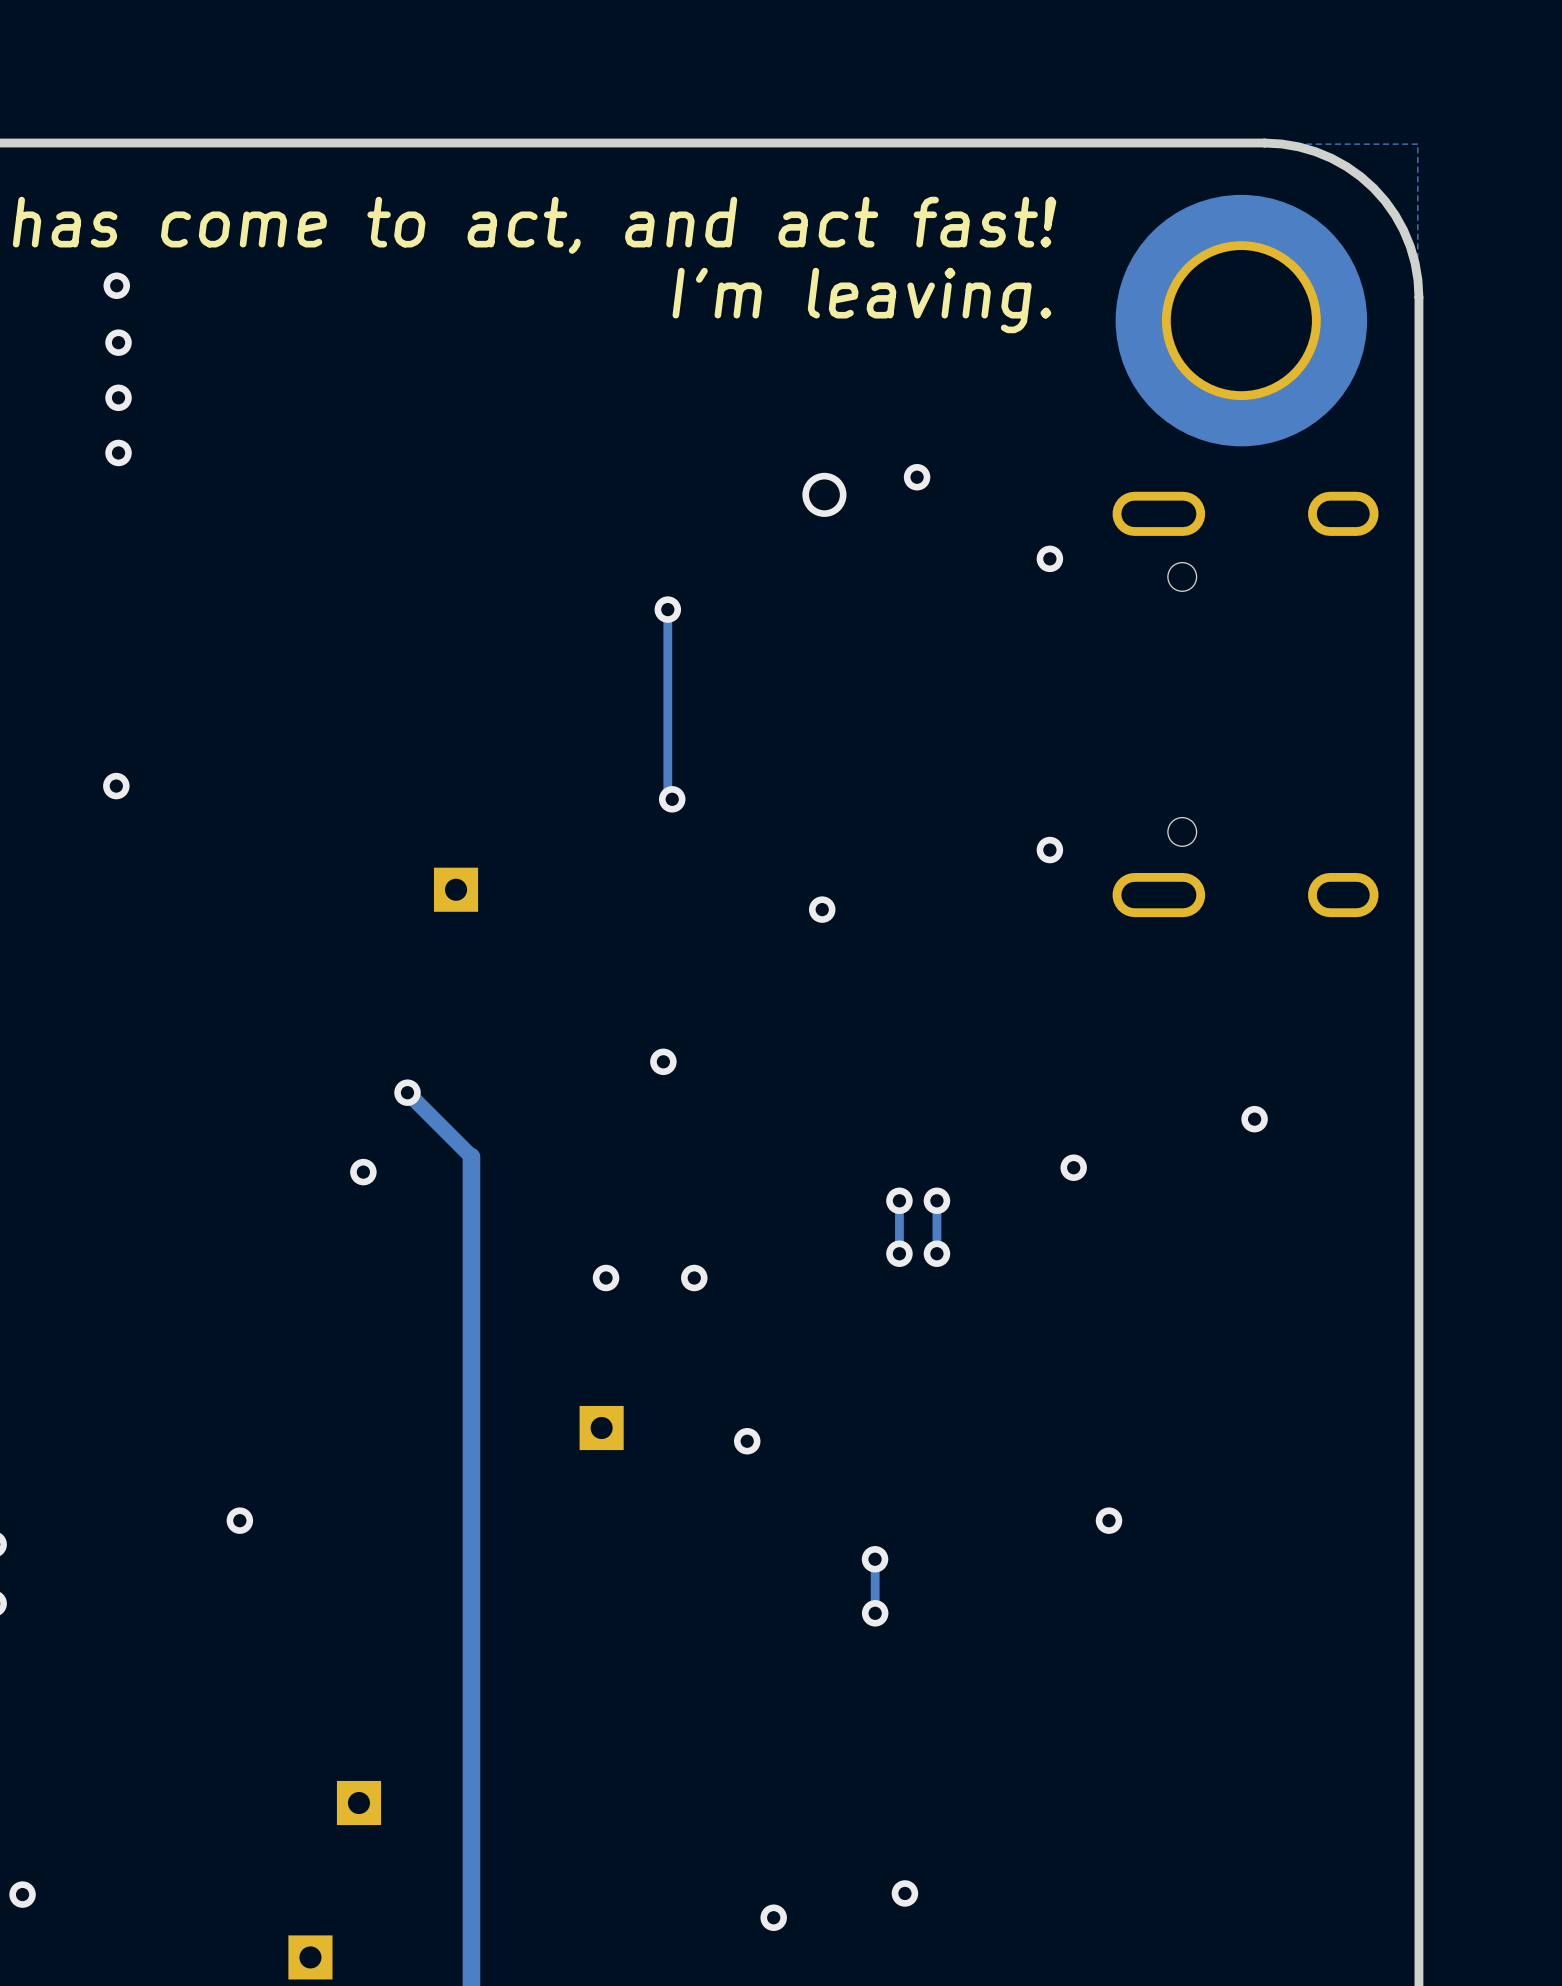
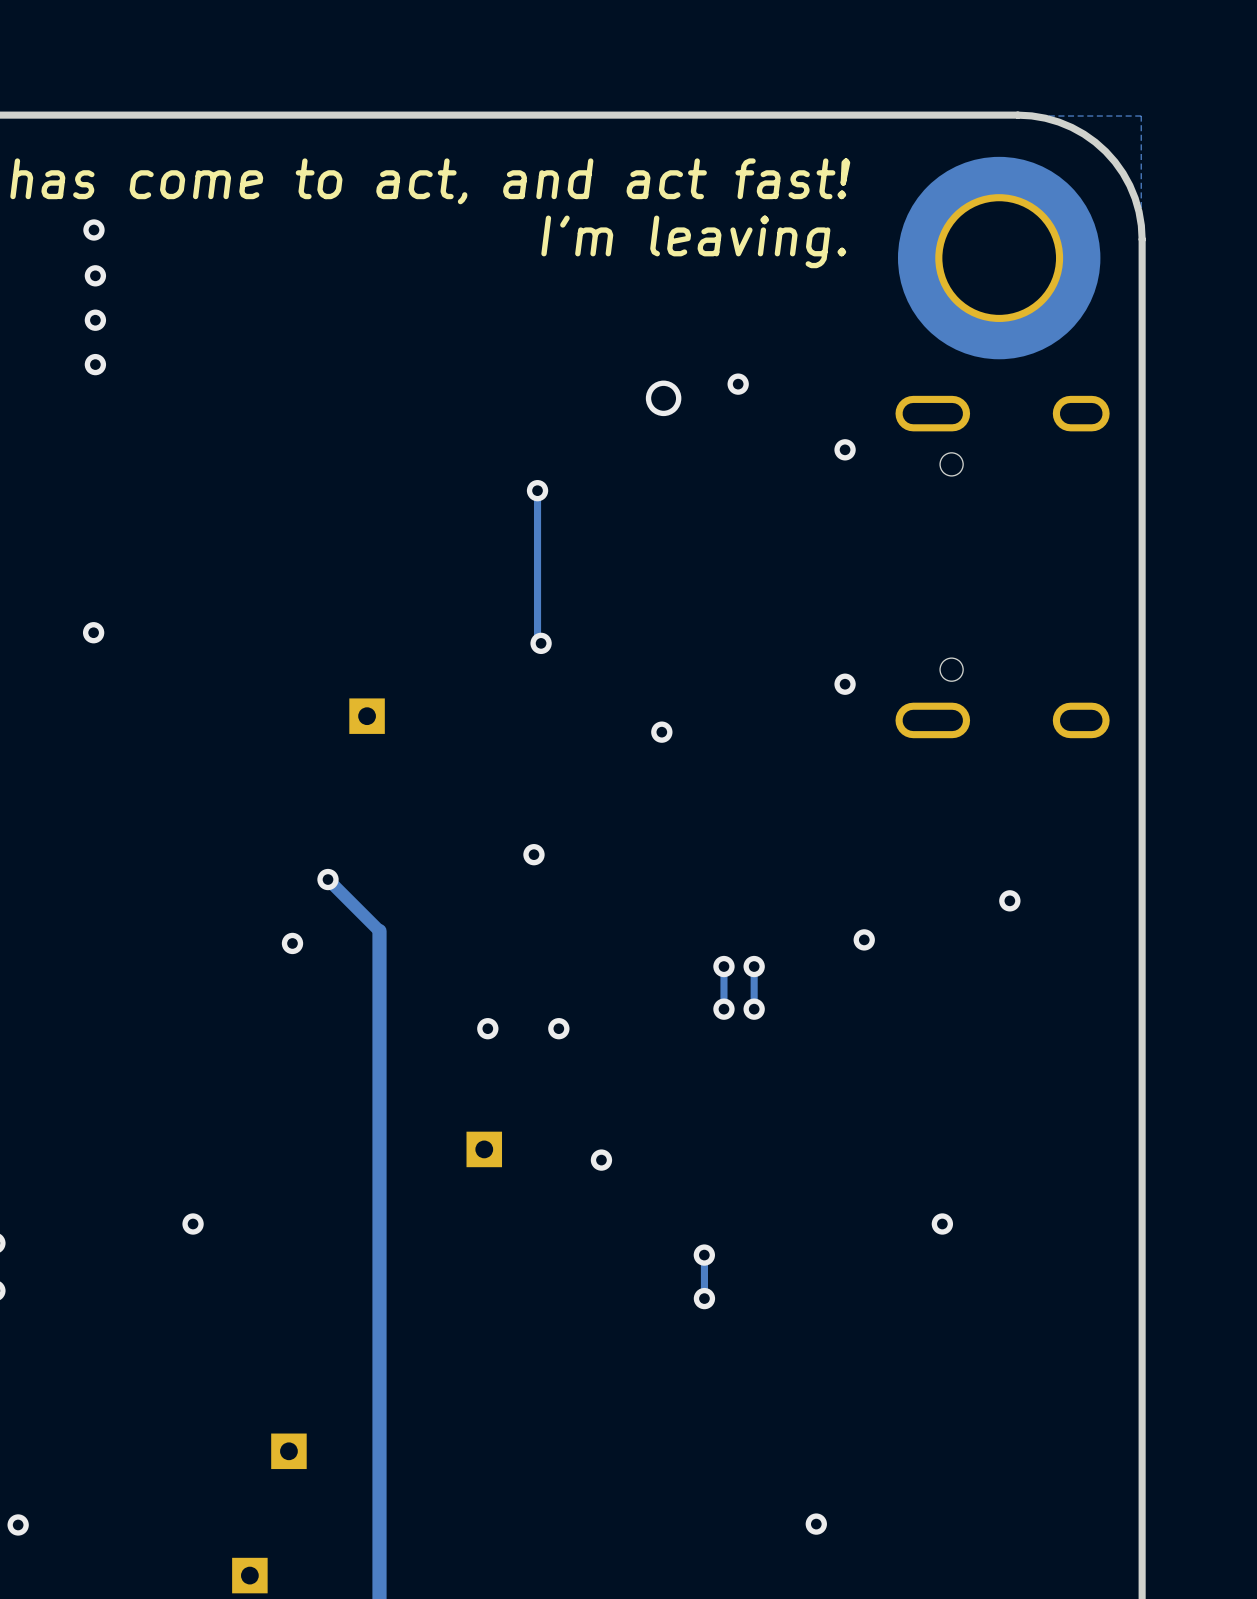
via position: (1109, 1520) -> (942, 1224)
via position: (904, 1893) -> (816, 1524)
via: (773, 1917) -> none

